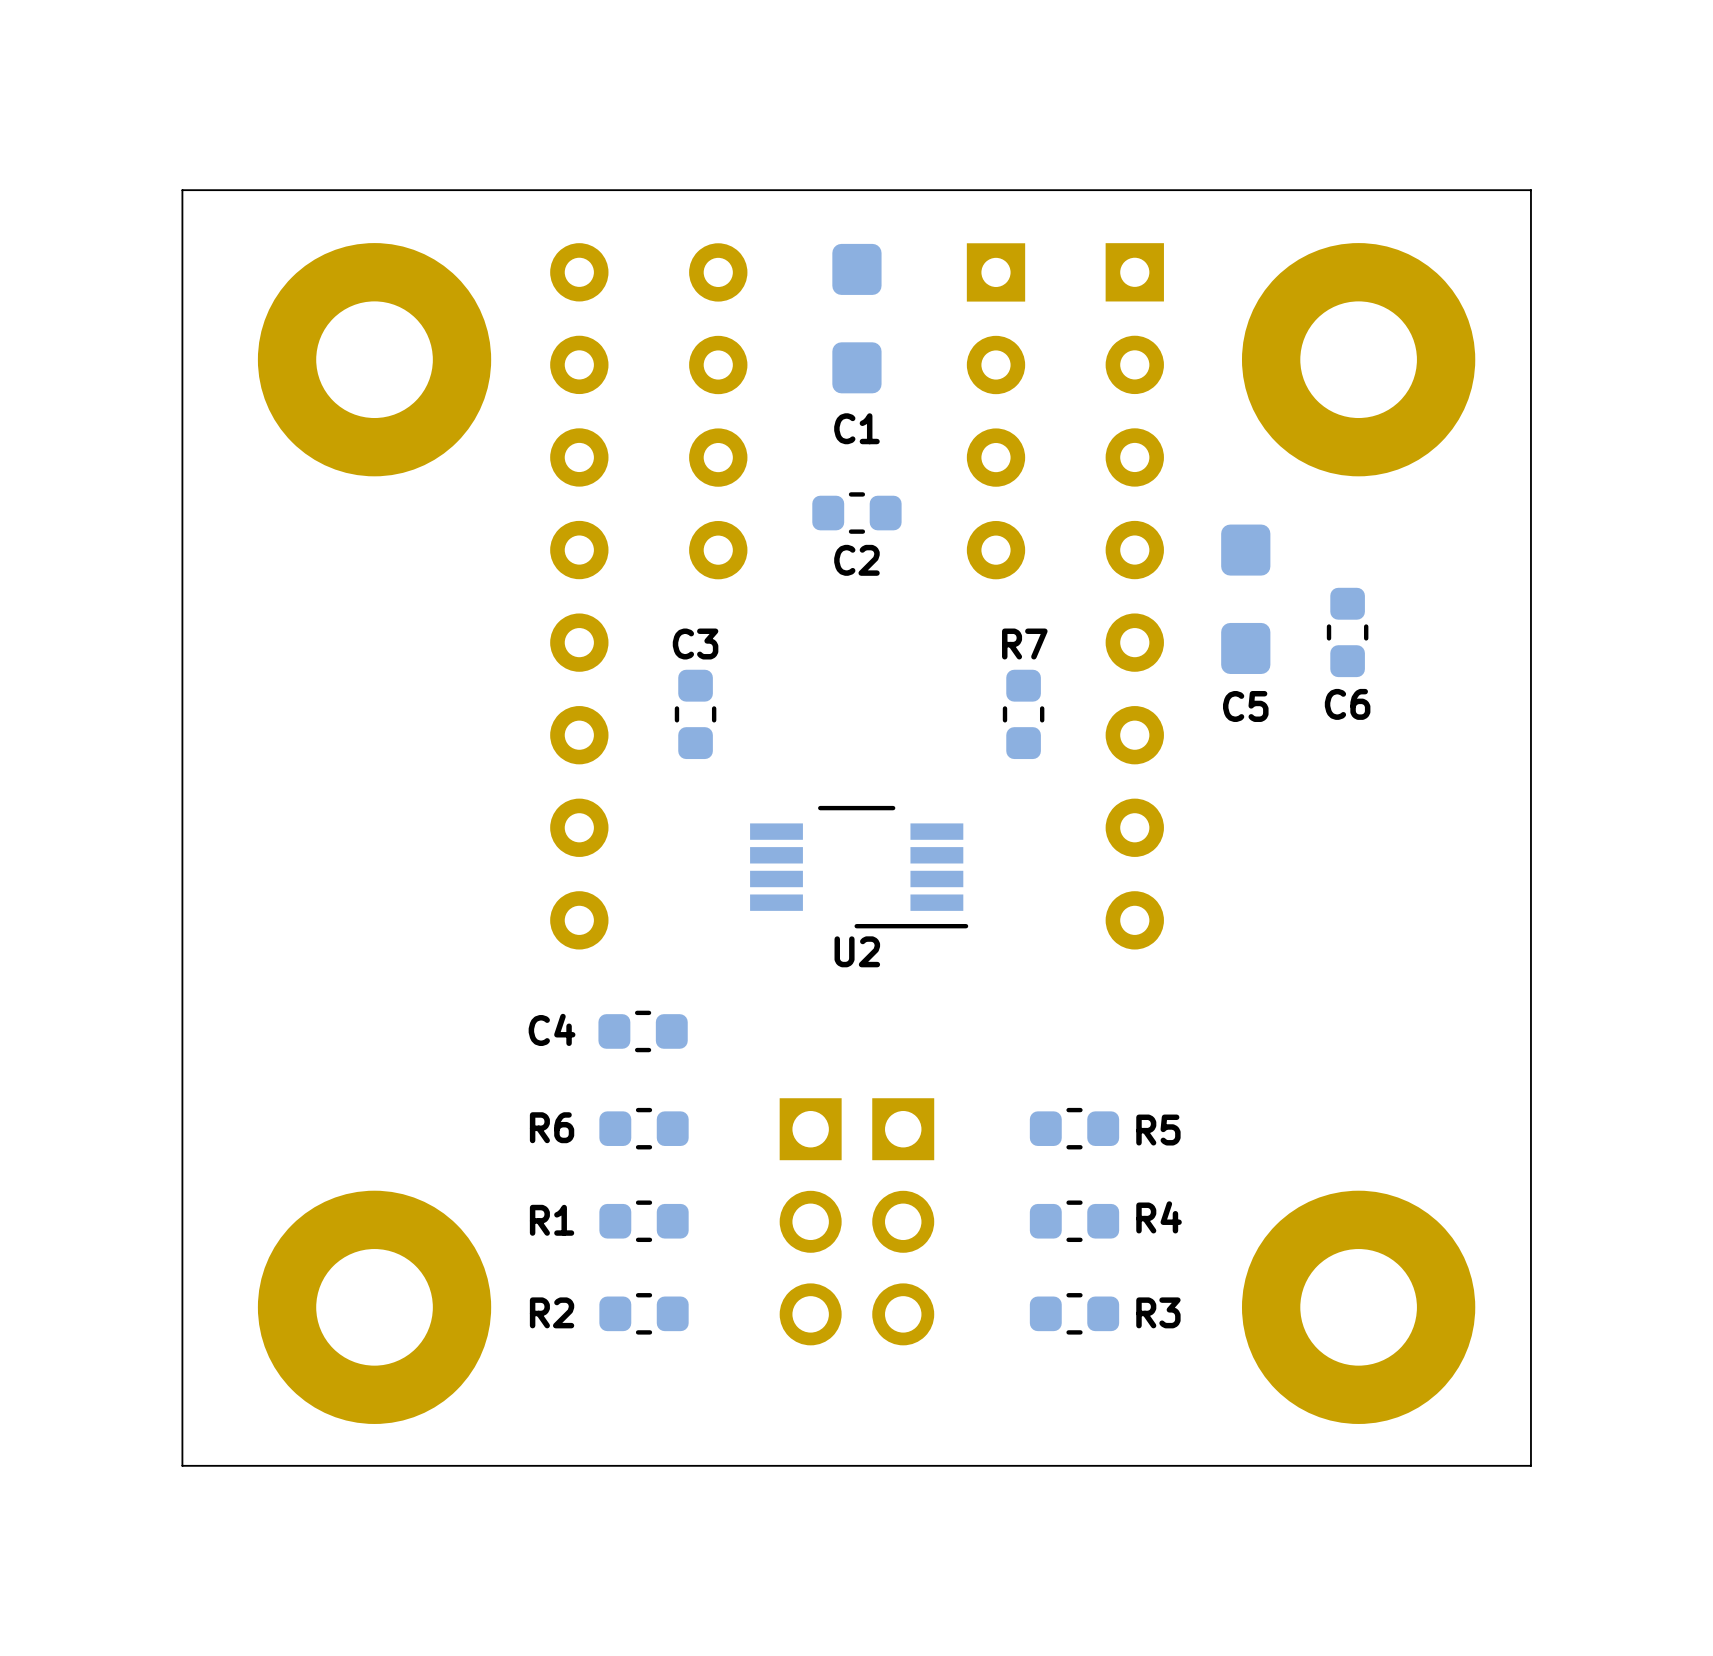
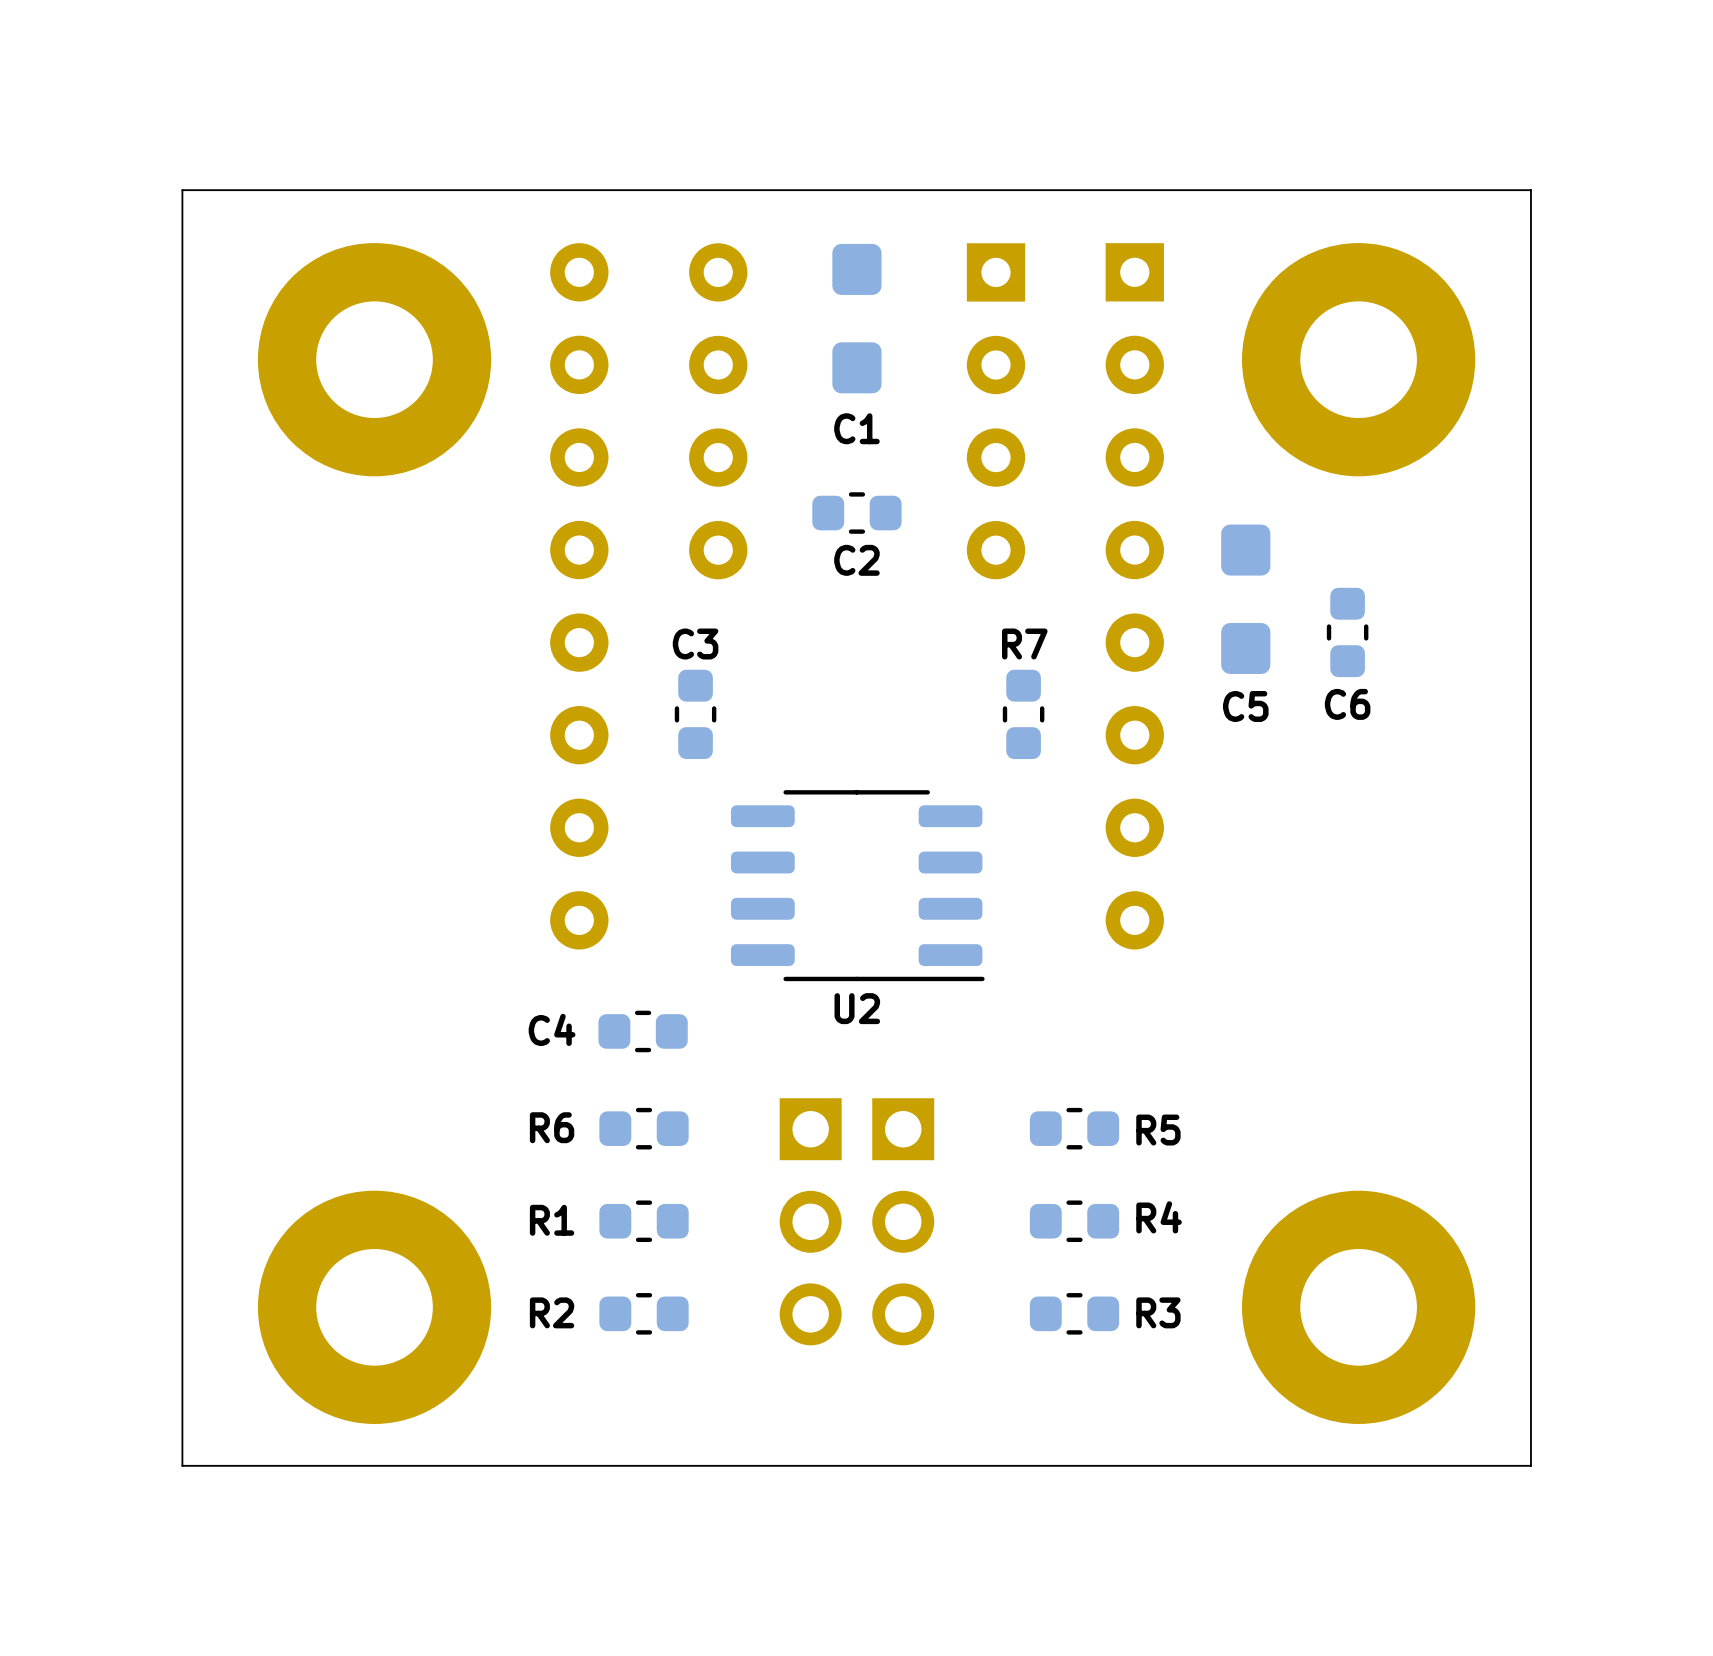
U2 footprint: [750, 805, 969, 929] -> [730, 790, 985, 982]

